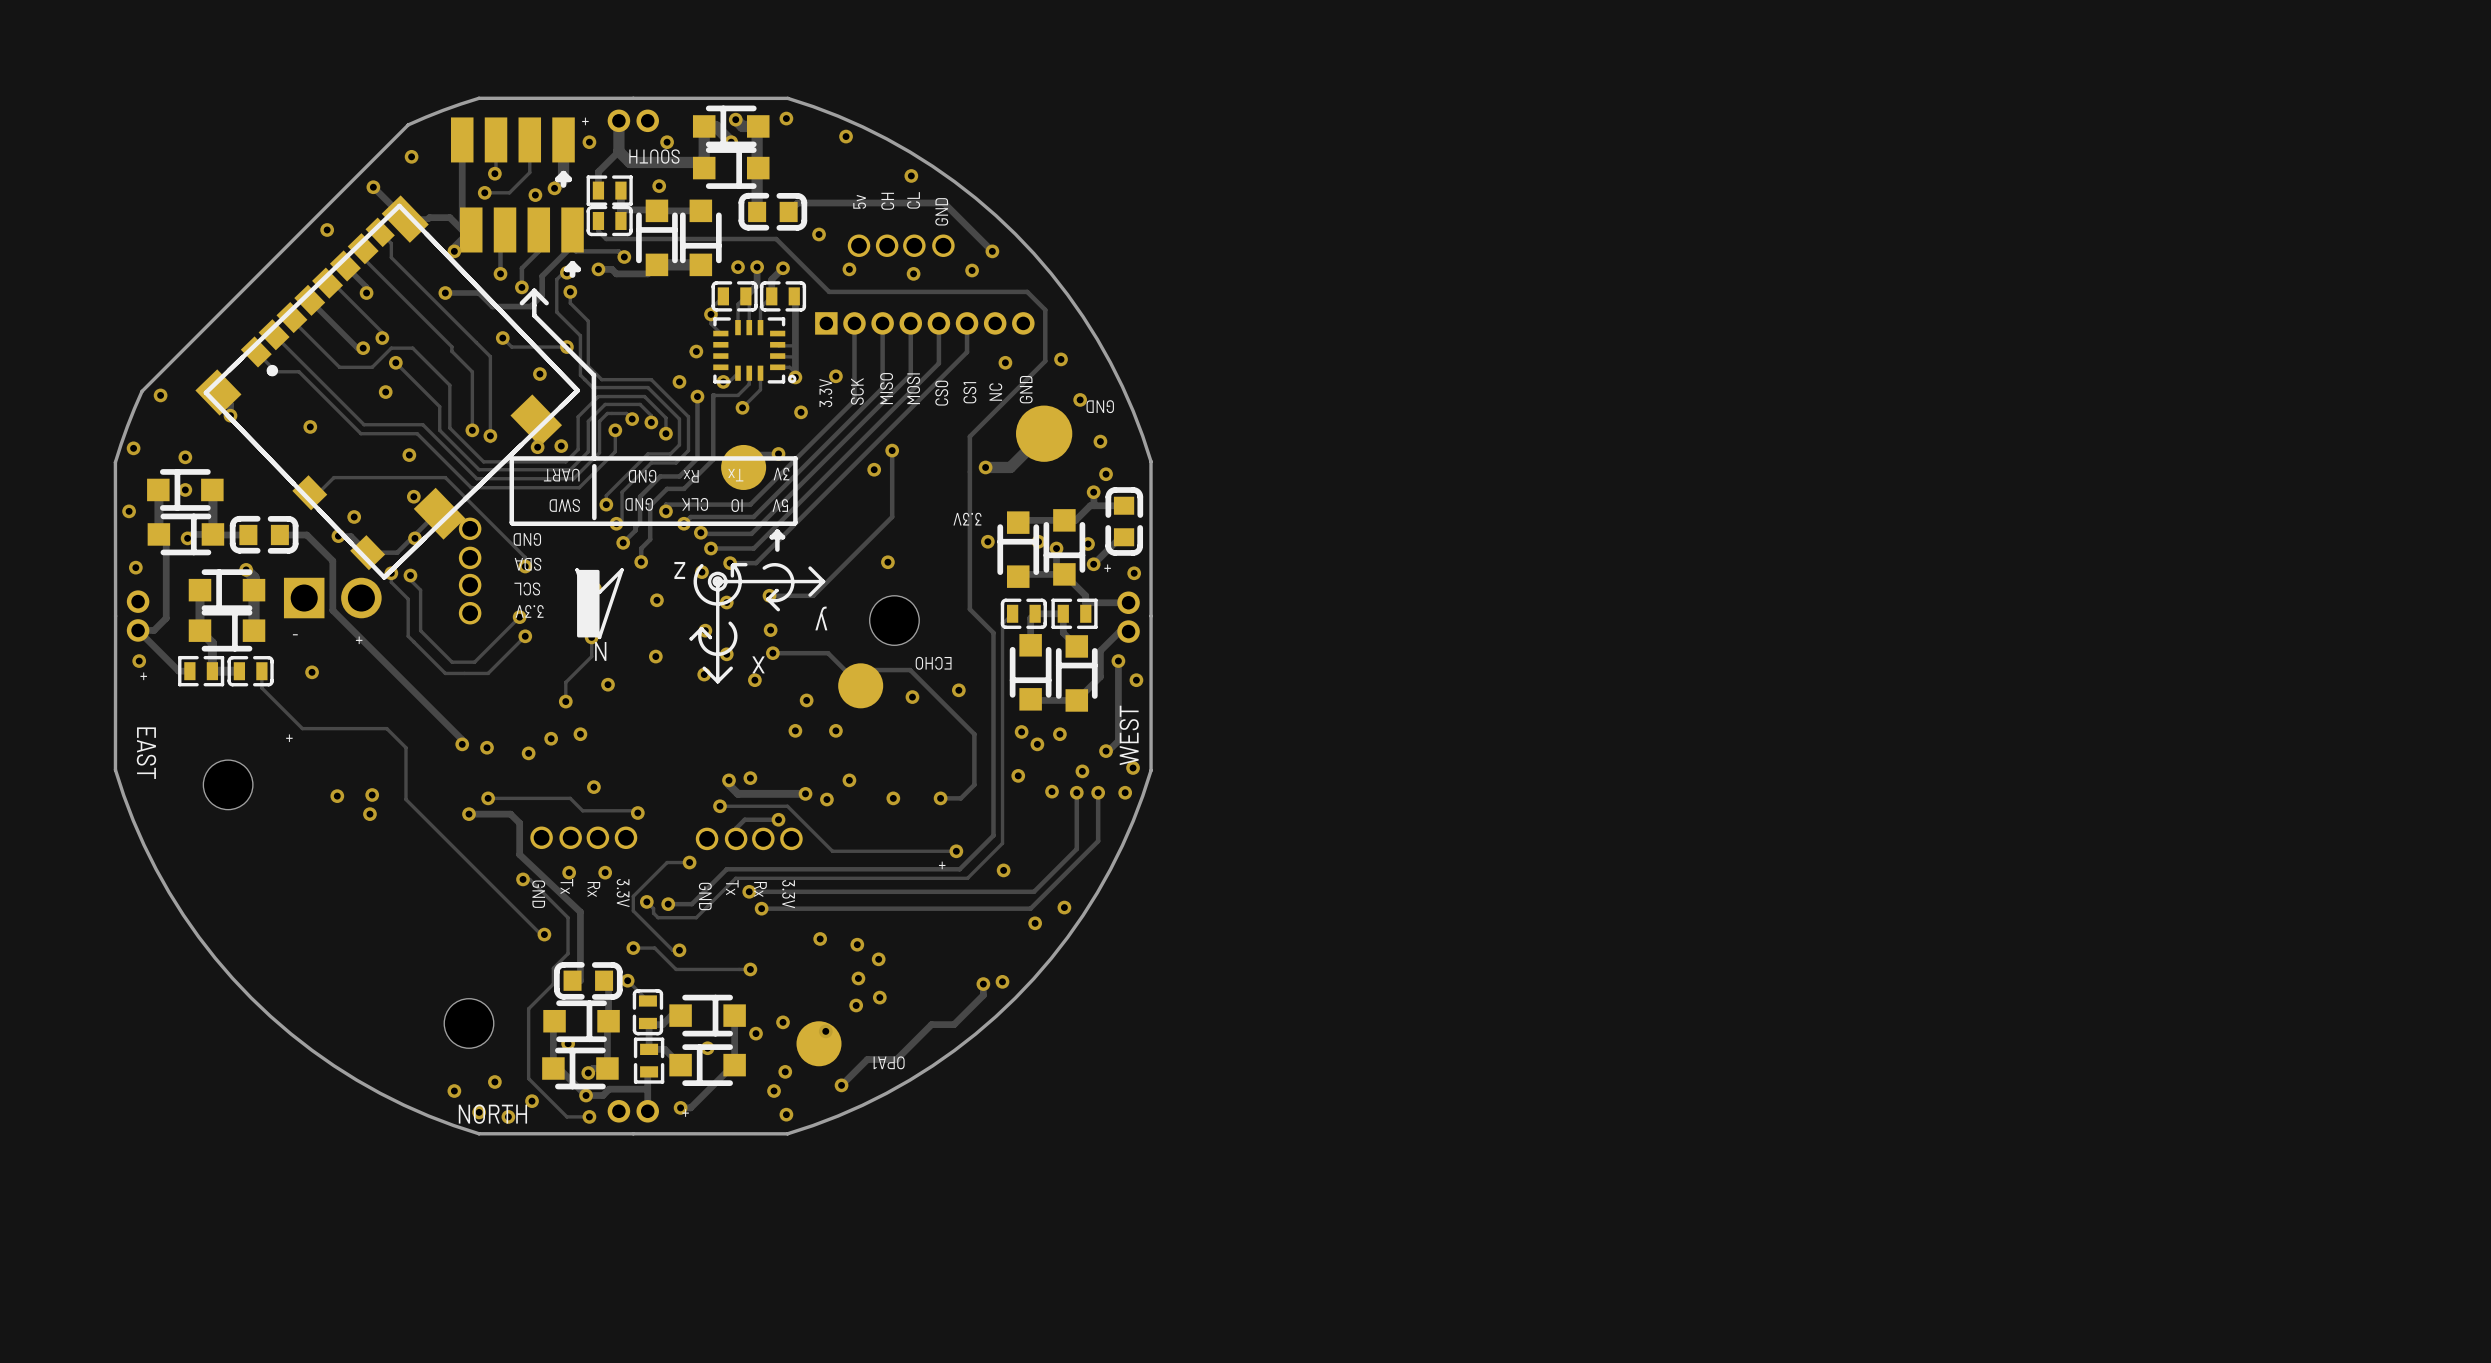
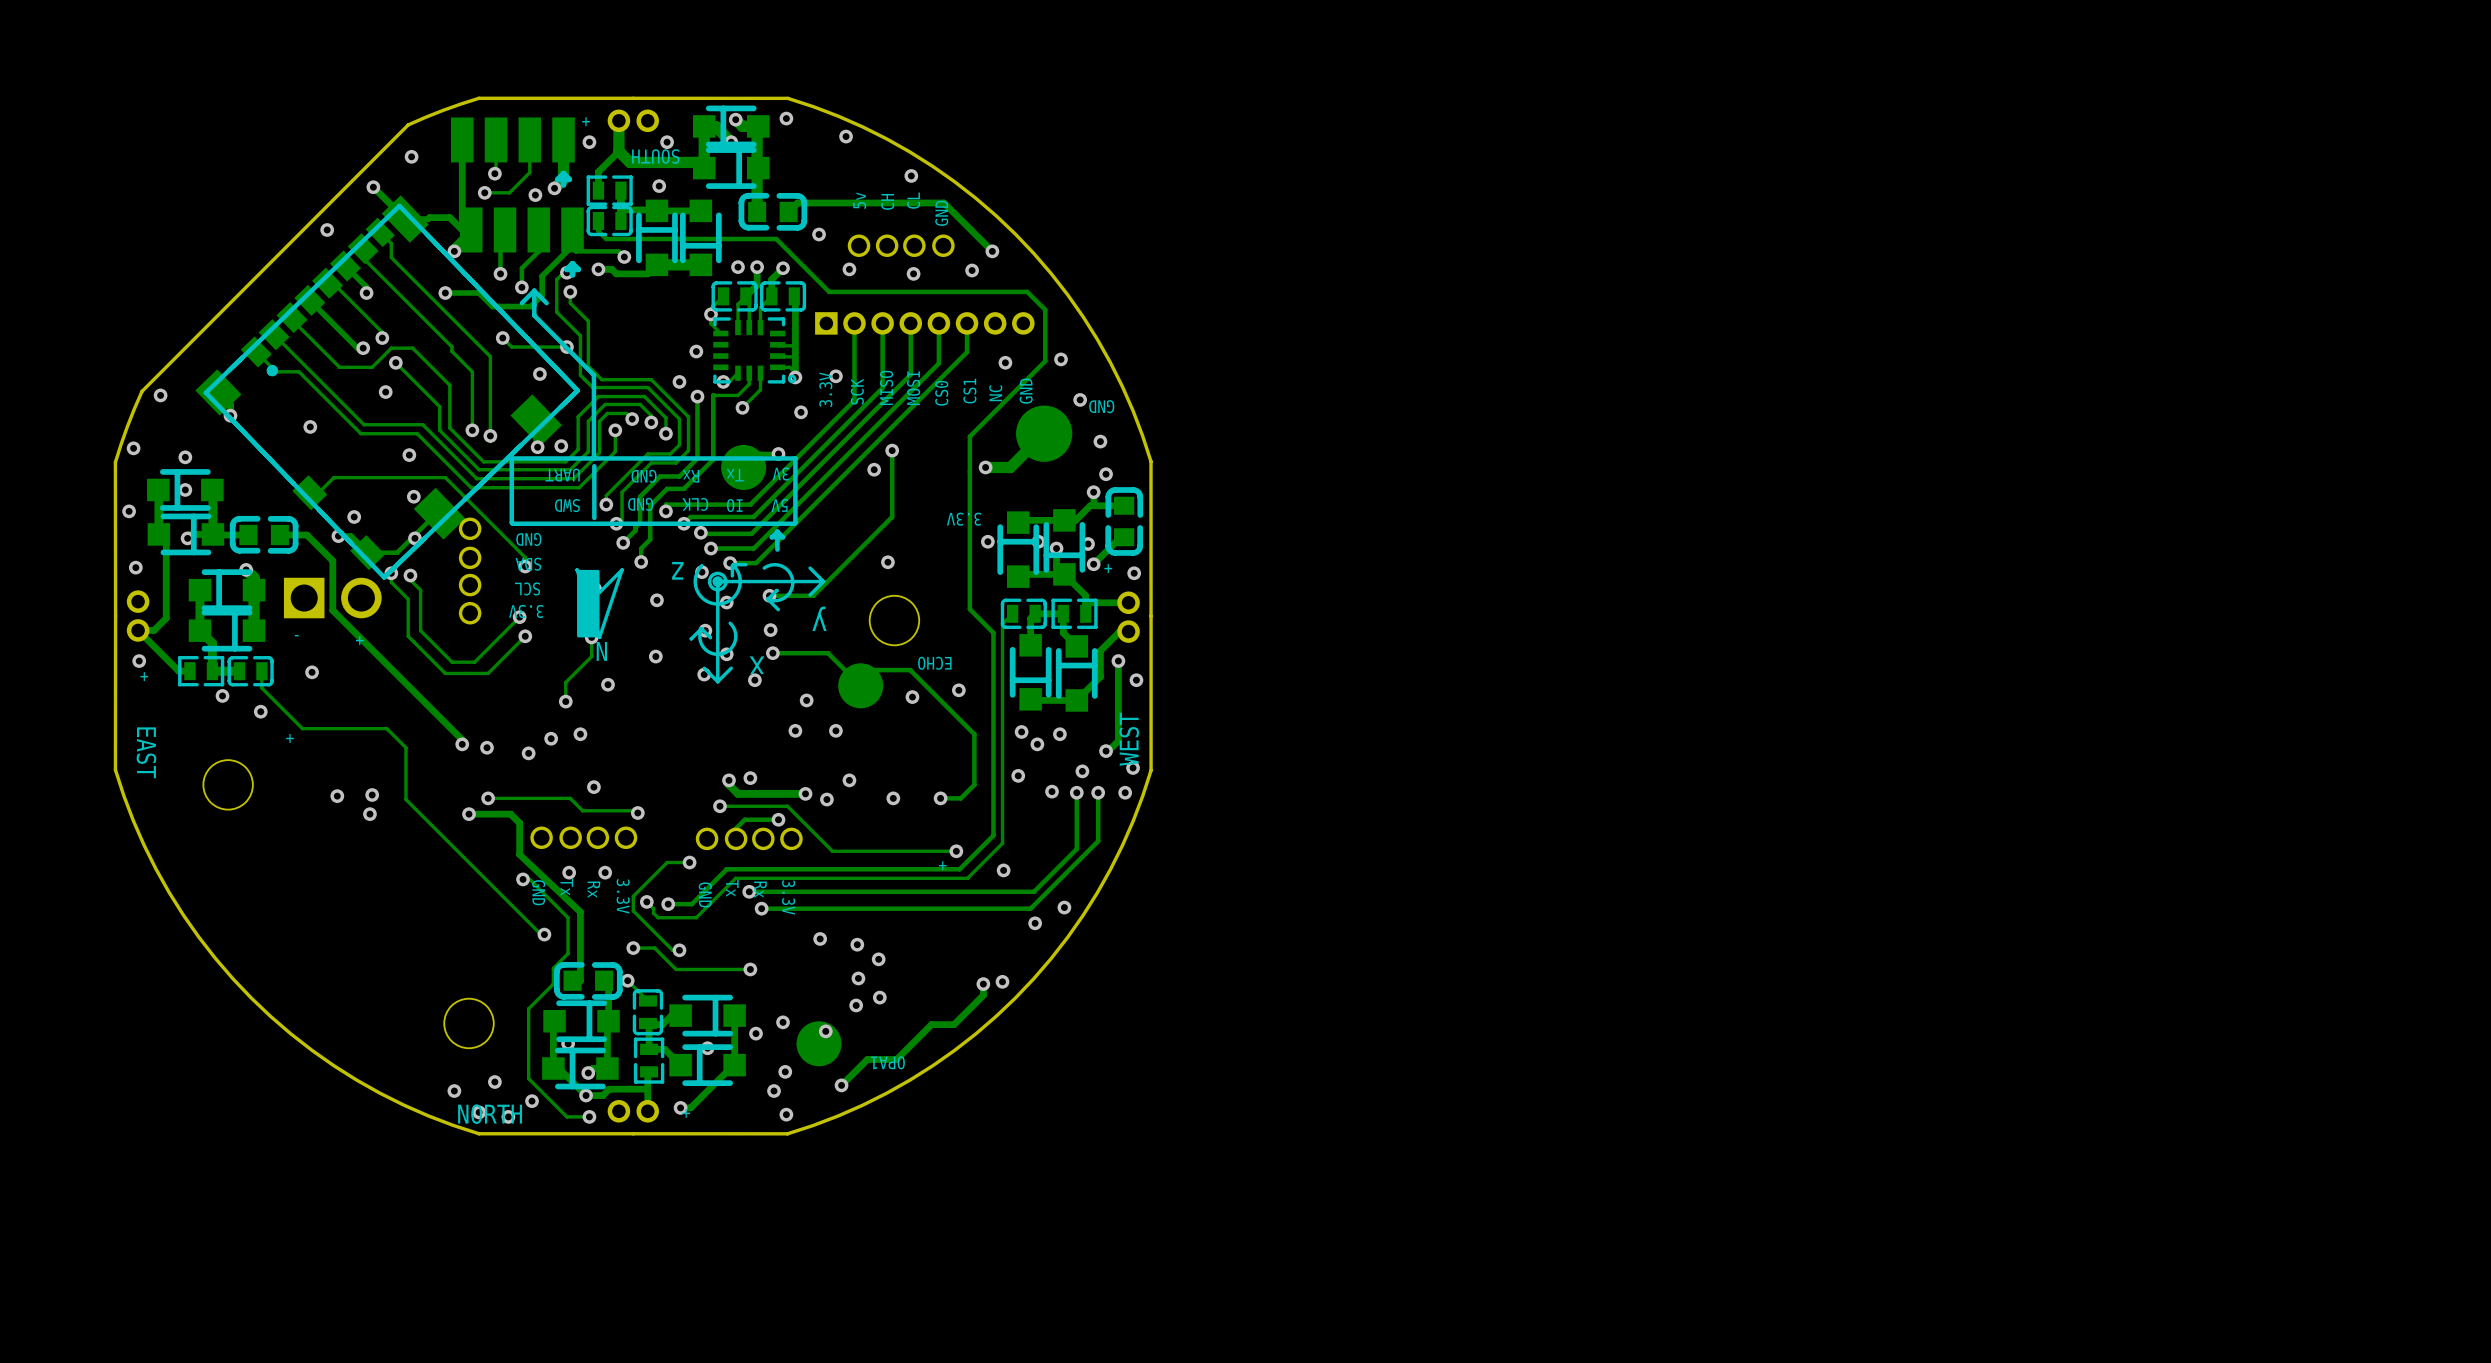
via: none -> (222, 695)
via: none -> (260, 711)

